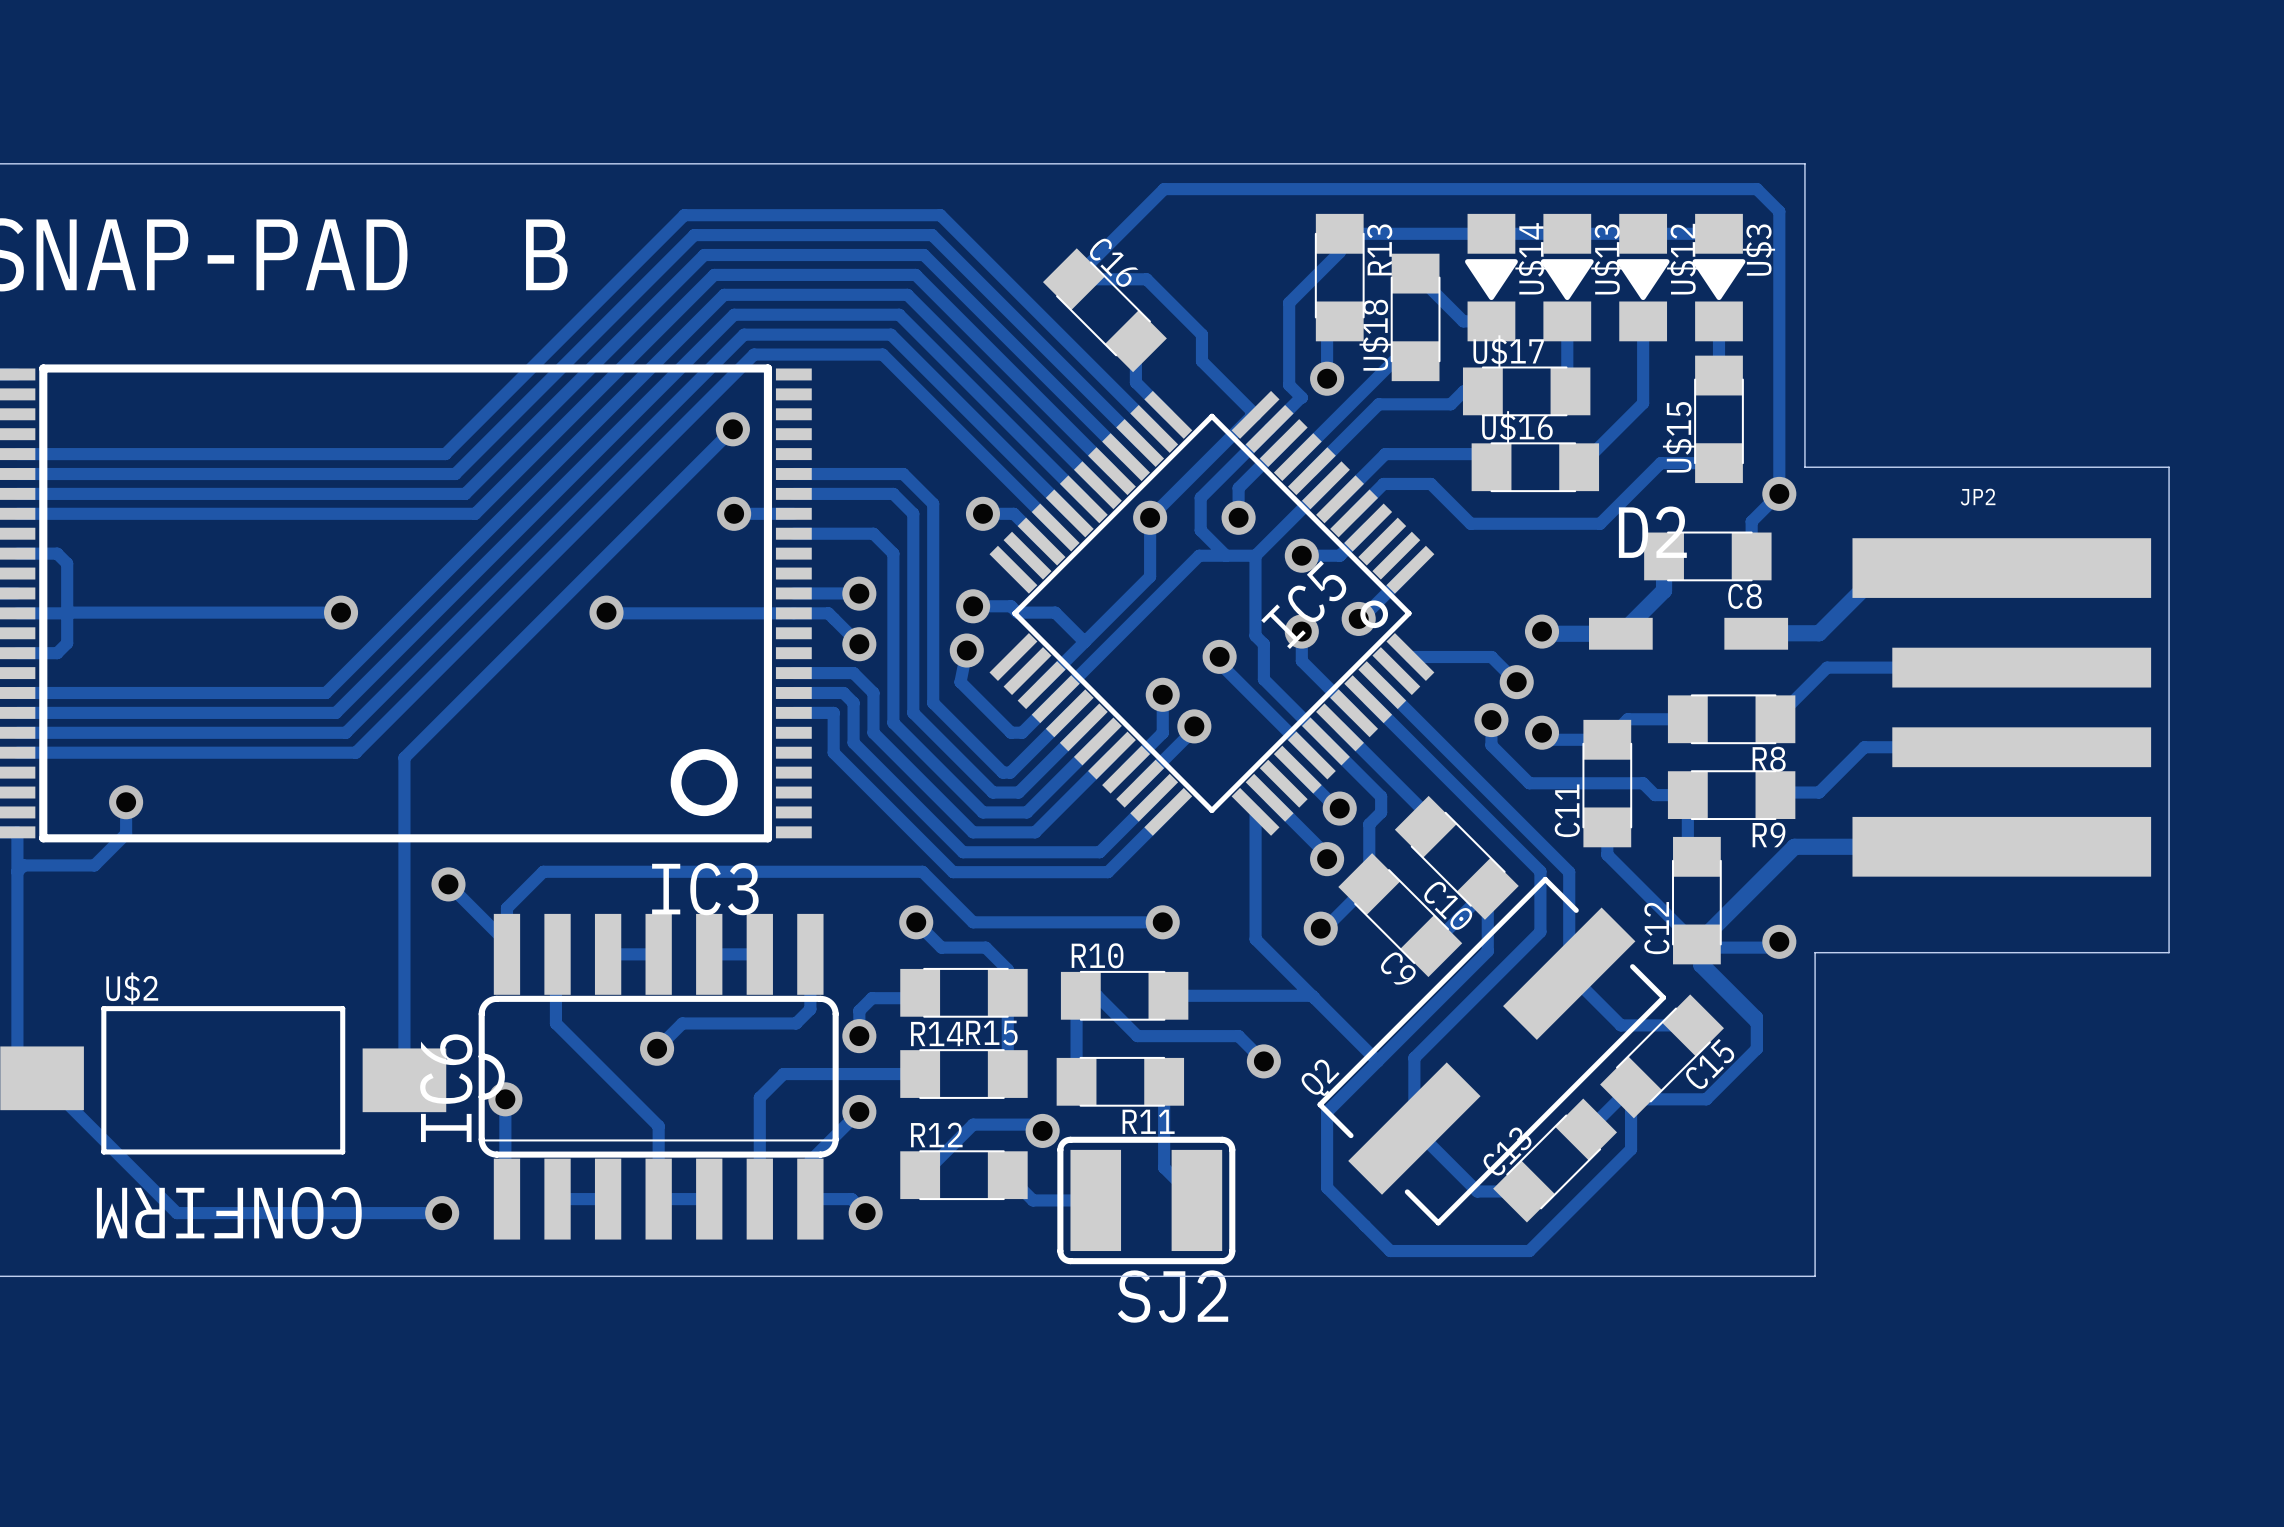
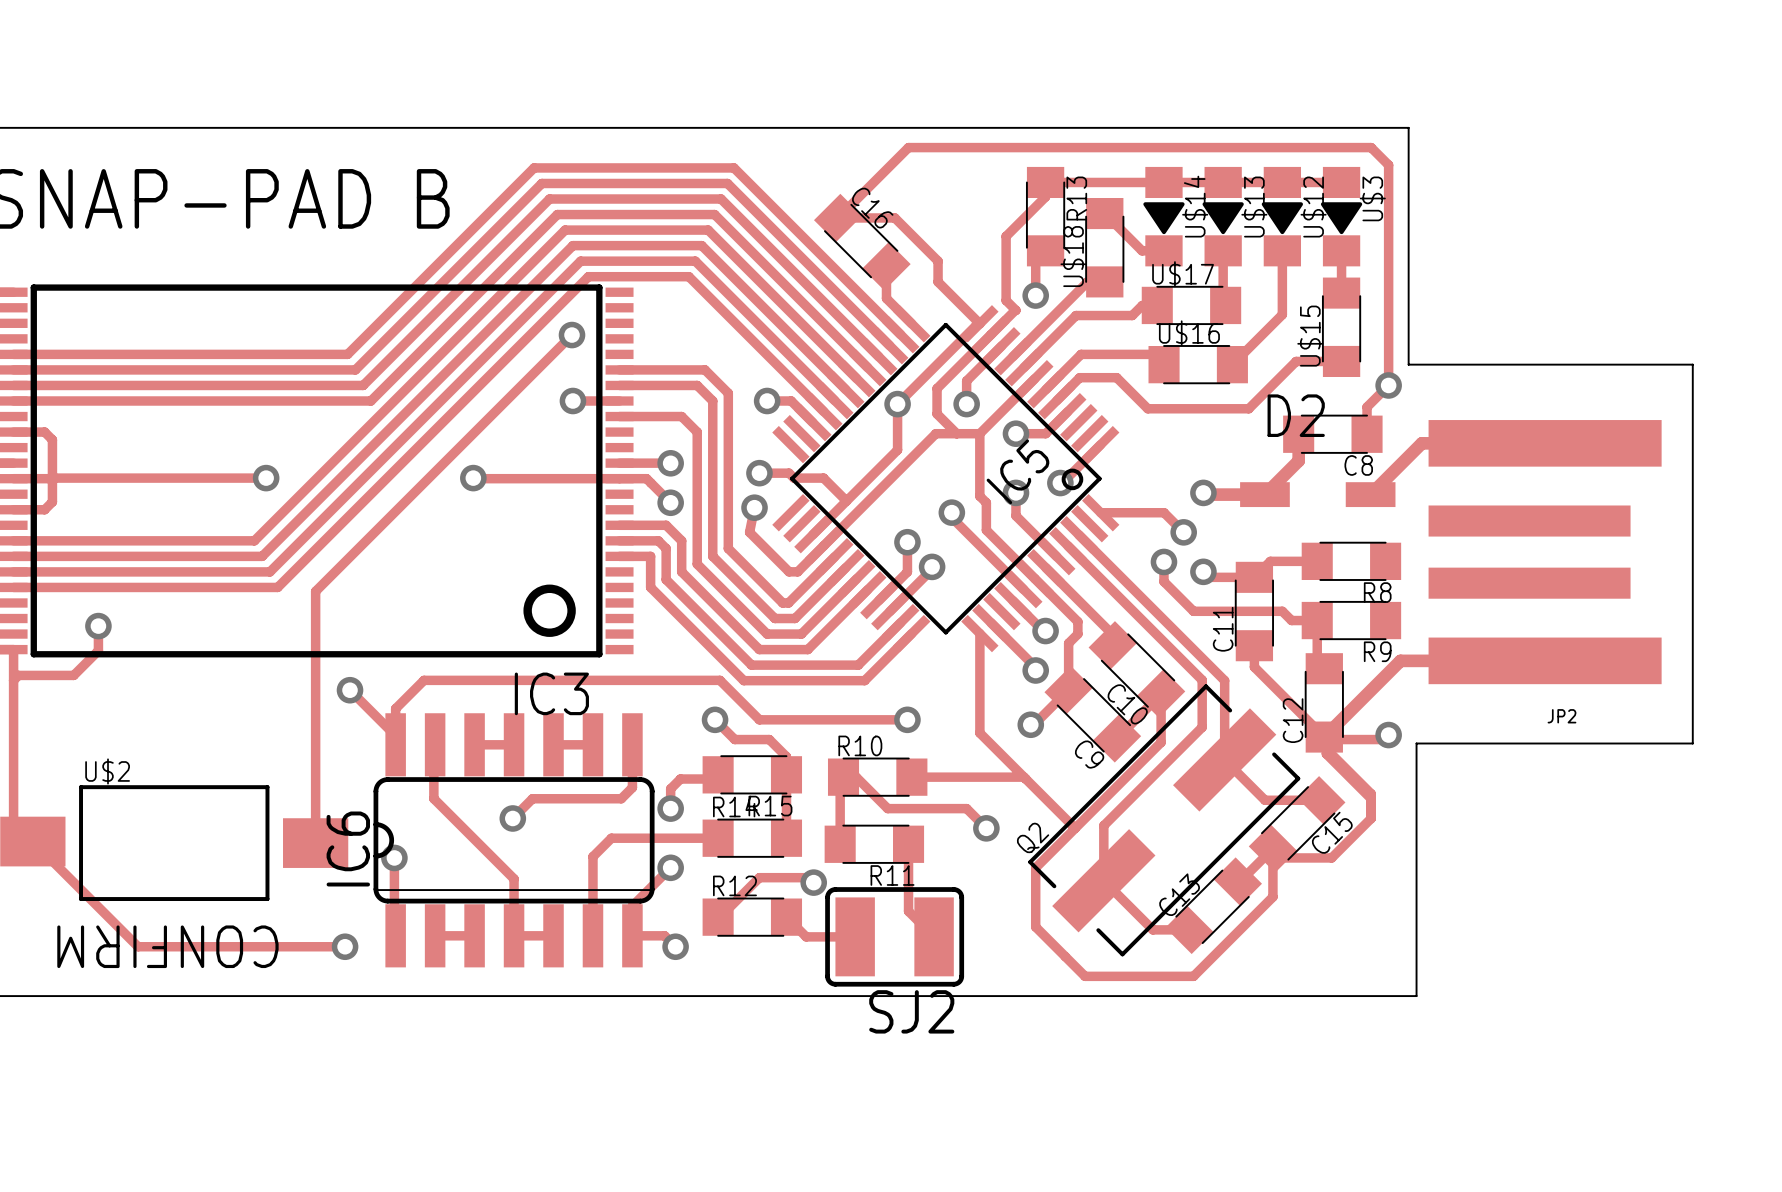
track: (1884, 568) (1819, 633) (1756, 633) -> (1470, 443) (1421, 443) (1371, 494)
track: (2021, 667) (1827, 667) (1775, 719) -> none
JP2 rotation: 0° (2001, 707) -> 180° (1545, 552)
track: (2021, 747) (1864, 747) (1819, 792) (1778, 792) (1775, 795) -> none

